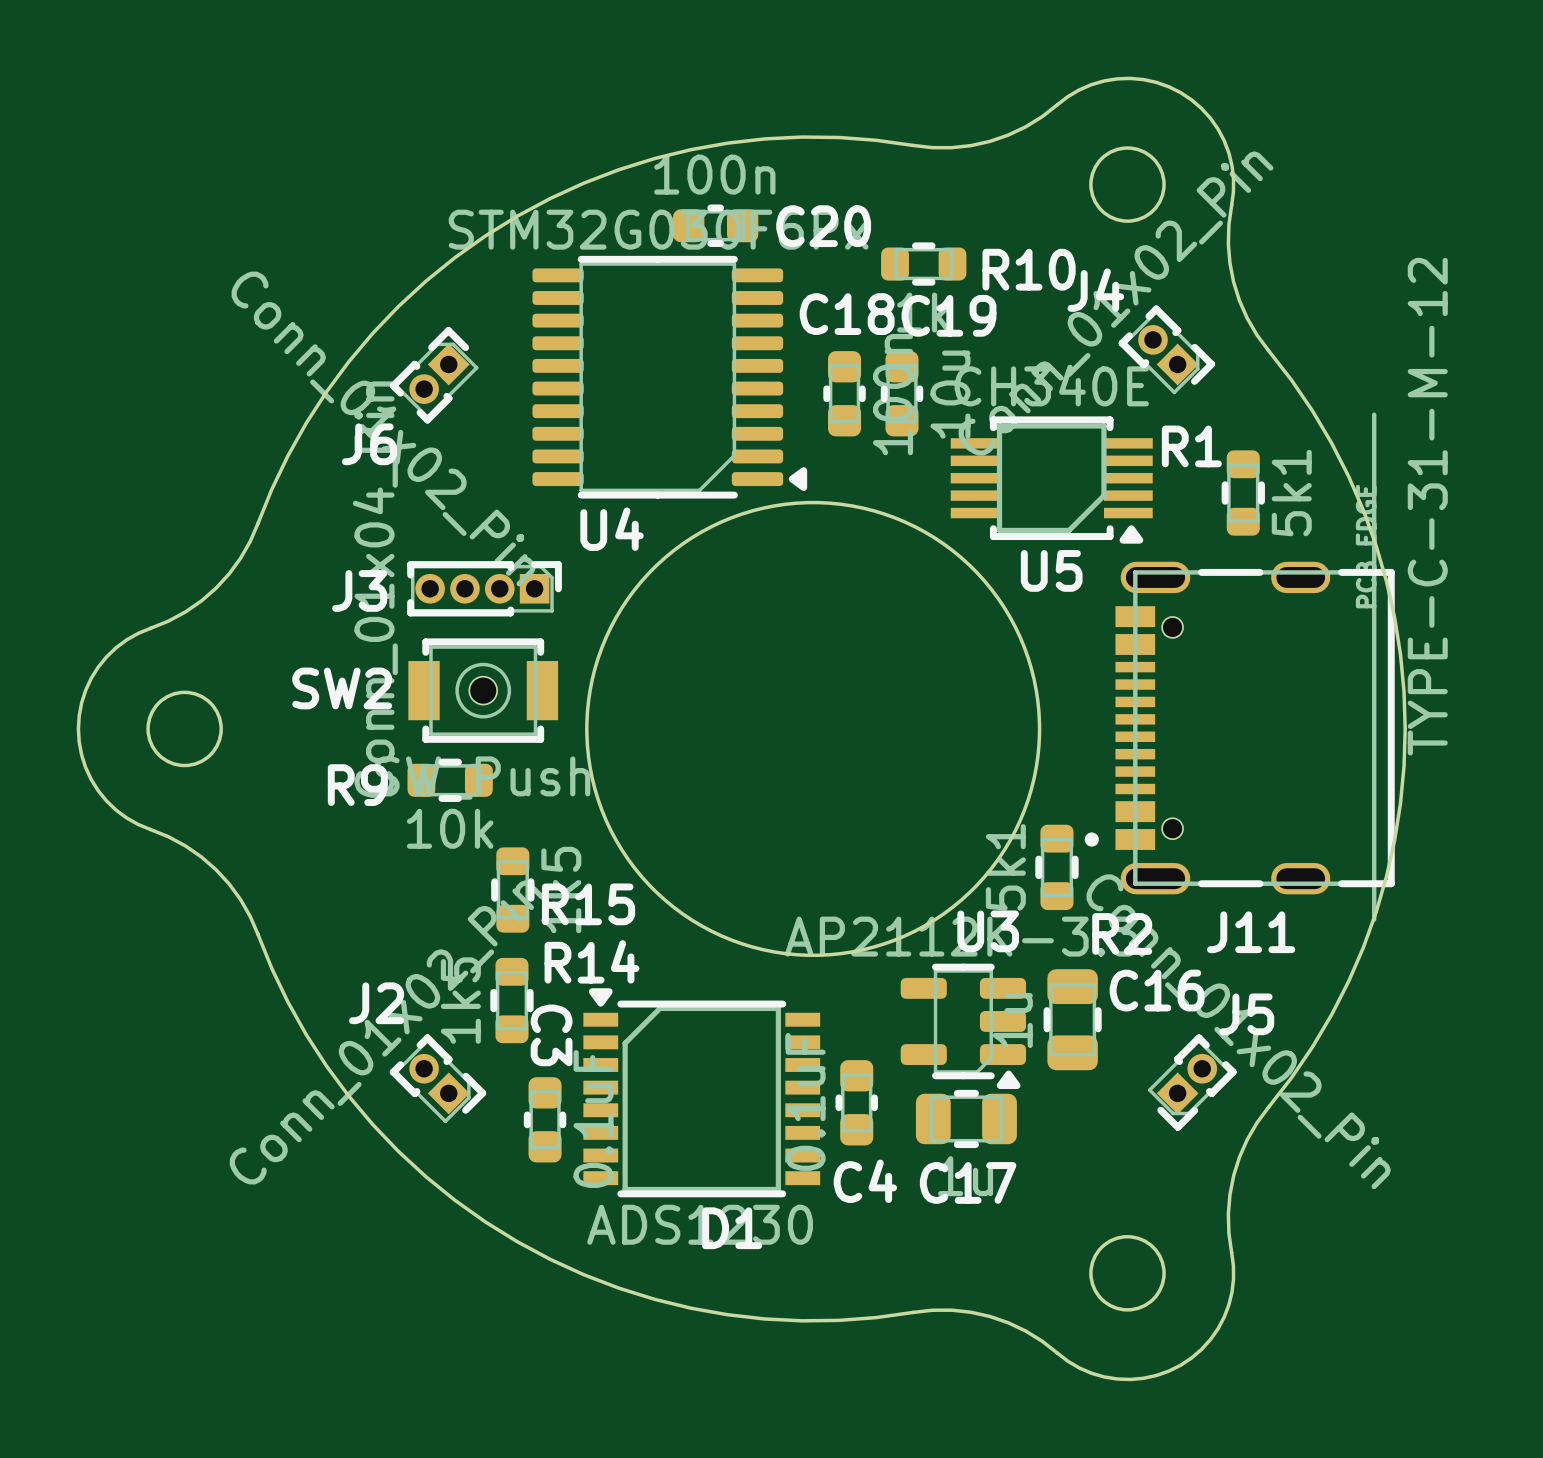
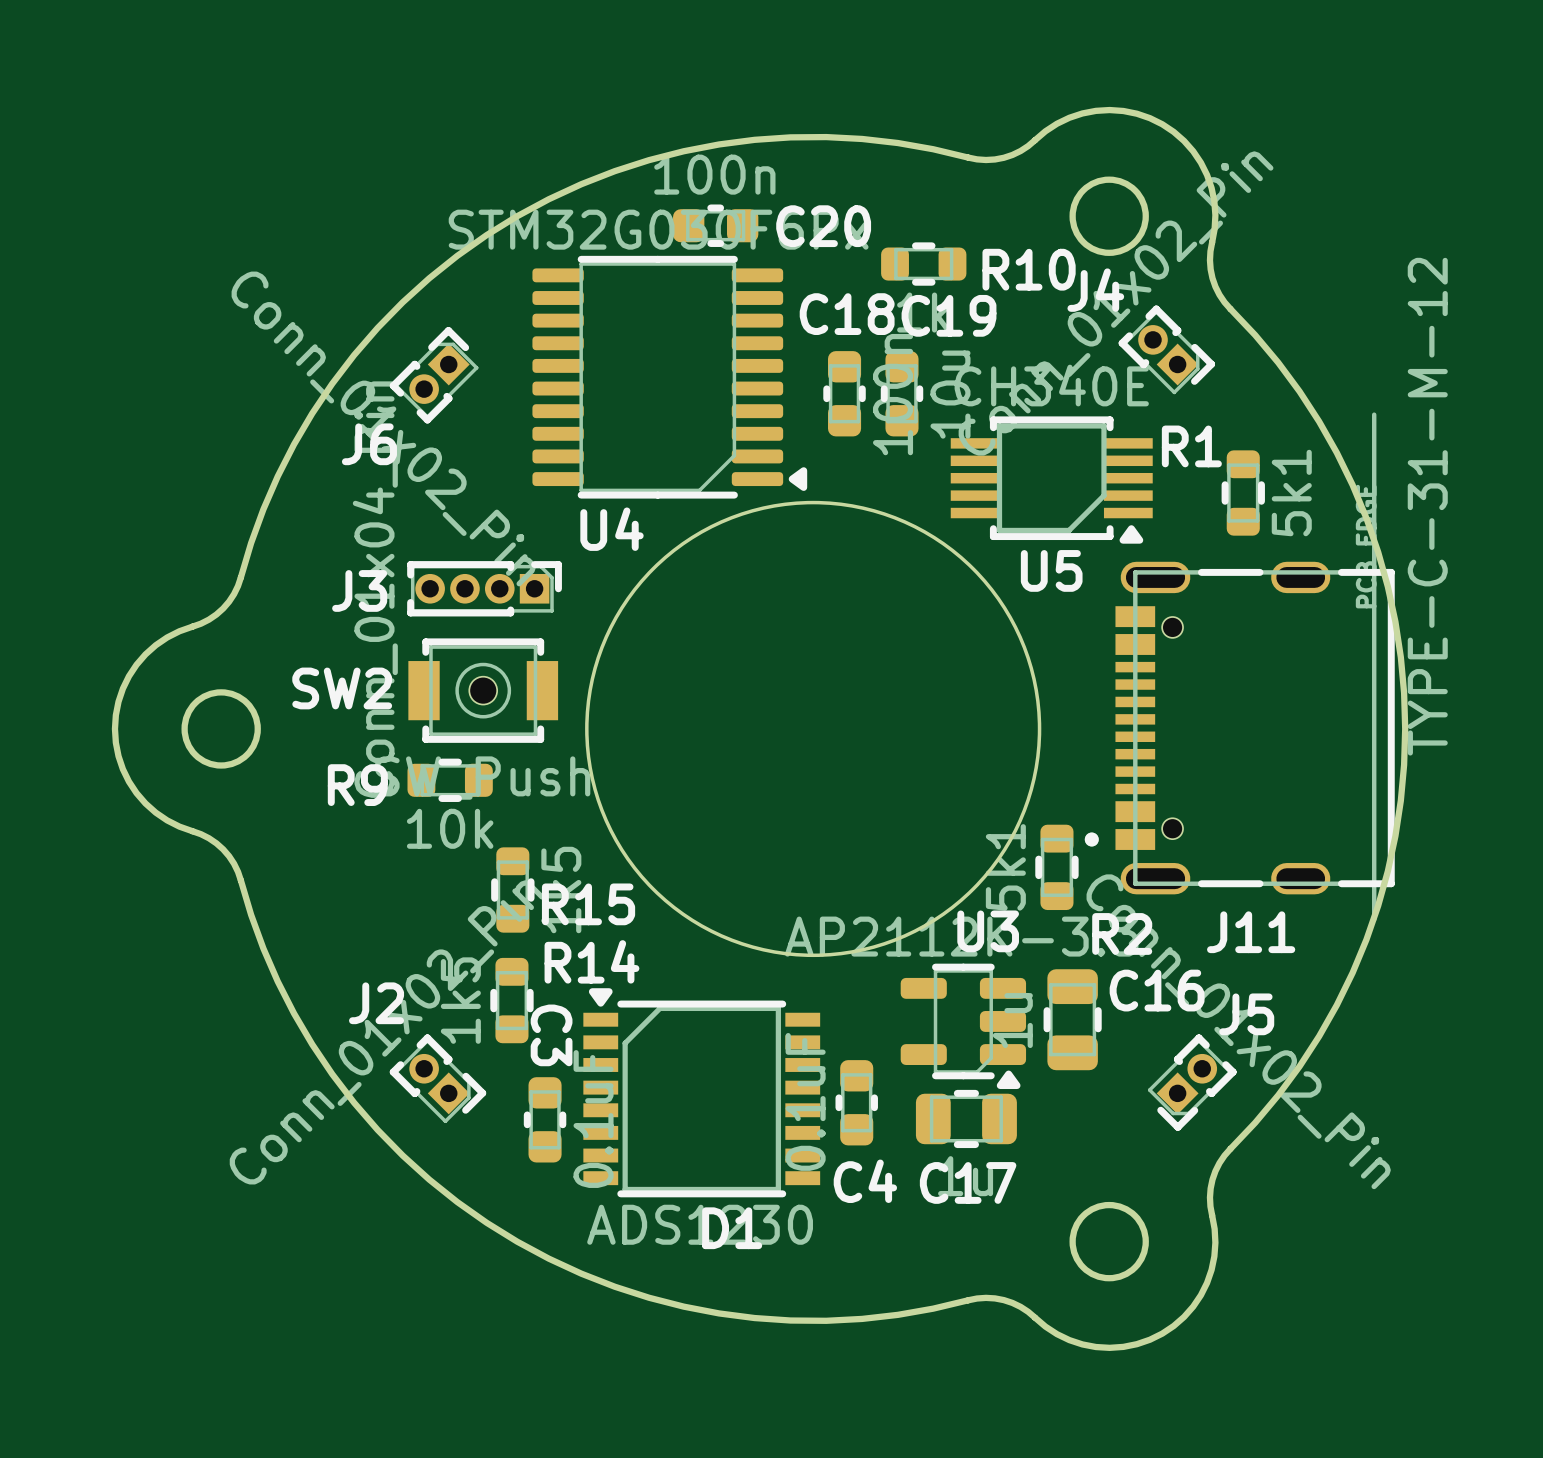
board edge: (1057, 104) (1025, 126) (989, 141) (971, 145) (932, 147) (876, 140) (801, 137) (727, 143) (690, 149) (618, 169) (584, 183) (550, 198) (485, 235) (455, 257) (398, 306) (348, 361) (306, 423) (271, 489) (250, 541) (229, 573) (201, 600) (185, 611) (126, 639) (106, 656) (98, 667) (85, 690) (79, 715) (78, 728) (79, 742) (85, 767) (98, 790) (106, 801) (126, 818) (185, 845) (215, 869) (229, 883) (250, 916) (271, 968) (306, 1034) (326, 1066) (372, 1124) (398, 1151) (455, 1200) (517, 1241) (584, 1274) (618, 1288) (690, 1308) (727, 1314) (764, 1318) (839, 1320) (932, 1310) (951, 1310) (989, 1316) (1025, 1331) (1079, 1367) (1104, 1376) (1130, 1379) (1143, 1378) (1168, 1371) (1191, 1357) (1210, 1339) (1224, 1317) (1228, 1304) (1233, 1278) (1228, 1233) (1229, 1194) (1239, 1157) (1256, 1122) (1291, 1077) (1331, 1014) (1363, 947) (1386, 876) (1394, 840) (1404, 766) (1404, 691) (1394, 617) (1386, 581) (1363, 510) (1331, 442) (1291, 380) (1256, 335) (1239, 300) (1229, 263) (1228, 243) (1233, 192) (1232, 165) (1224, 140) (1218, 129) (1210, 118) (1191, 99) (1168, 86) (1143, 79) (1117, 78) (1091, 84) (1067, 96) (1057, 104) -> (1035, 140) (1012, 154) (986, 160) (897, 143) (862, 138) (790, 137) (719, 144) (649, 160) (614, 171) (548, 199) (517, 216) (486, 235) (429, 278) (377, 328) (354, 355) (312, 413) (277, 476) (251, 543) (238, 586) (229, 601) (208, 619) (179, 631) (155, 645) (136, 664) (122, 688) (115, 715) (115, 742) (118, 756) (128, 781) (145, 803) (155, 812) (179, 826) (208, 838) (229, 856) (238, 871) (251, 914) (277, 981) (312, 1044) (354, 1102) (402, 1155) (457, 1202) (486, 1222) (548, 1258) (614, 1286) (683, 1306) (754, 1318) (790, 1320) (862, 1318) (933, 1308) (977, 1298) (995, 1298) (1020, 1306) (1057, 1334) (1082, 1344) (1109, 1347) (1136, 1344) (1149, 1339) (1173, 1325) (1184, 1316) (1200, 1295) (1211, 1269) (1214, 1256) (1214, 1228) (1209, 1197) (1215, 1171) (1224, 1155) (1255, 1122) (1299, 1066) (1336, 1005) (1366, 939) (1387, 871) (1395, 836) (1400, 800) (1405, 728) (1400, 657) (1395, 621) (1387, 586) (1366, 518) (1336, 452) (1299, 391) (1255, 335) (1224, 302) (1215, 286) (1209, 260) (1214, 228) (1214, 201) (1207, 174) (1193, 151) (1184, 140) (1162, 124) (1149, 118) (1123, 110) (1109, 110) (1082, 113) (1057, 123) (1035, 140)
round board edge: [1089, 146, 1166, 223] -> none
round board edge: none -> [1069, 176, 1149, 256]
round board edge: none -> [181, 689, 261, 769]
round board edge: [146, 690, 223, 768] -> none
round board edge: none -> [1069, 1201, 1149, 1282]
round board edge: [1089, 1234, 1166, 1312] -> none

